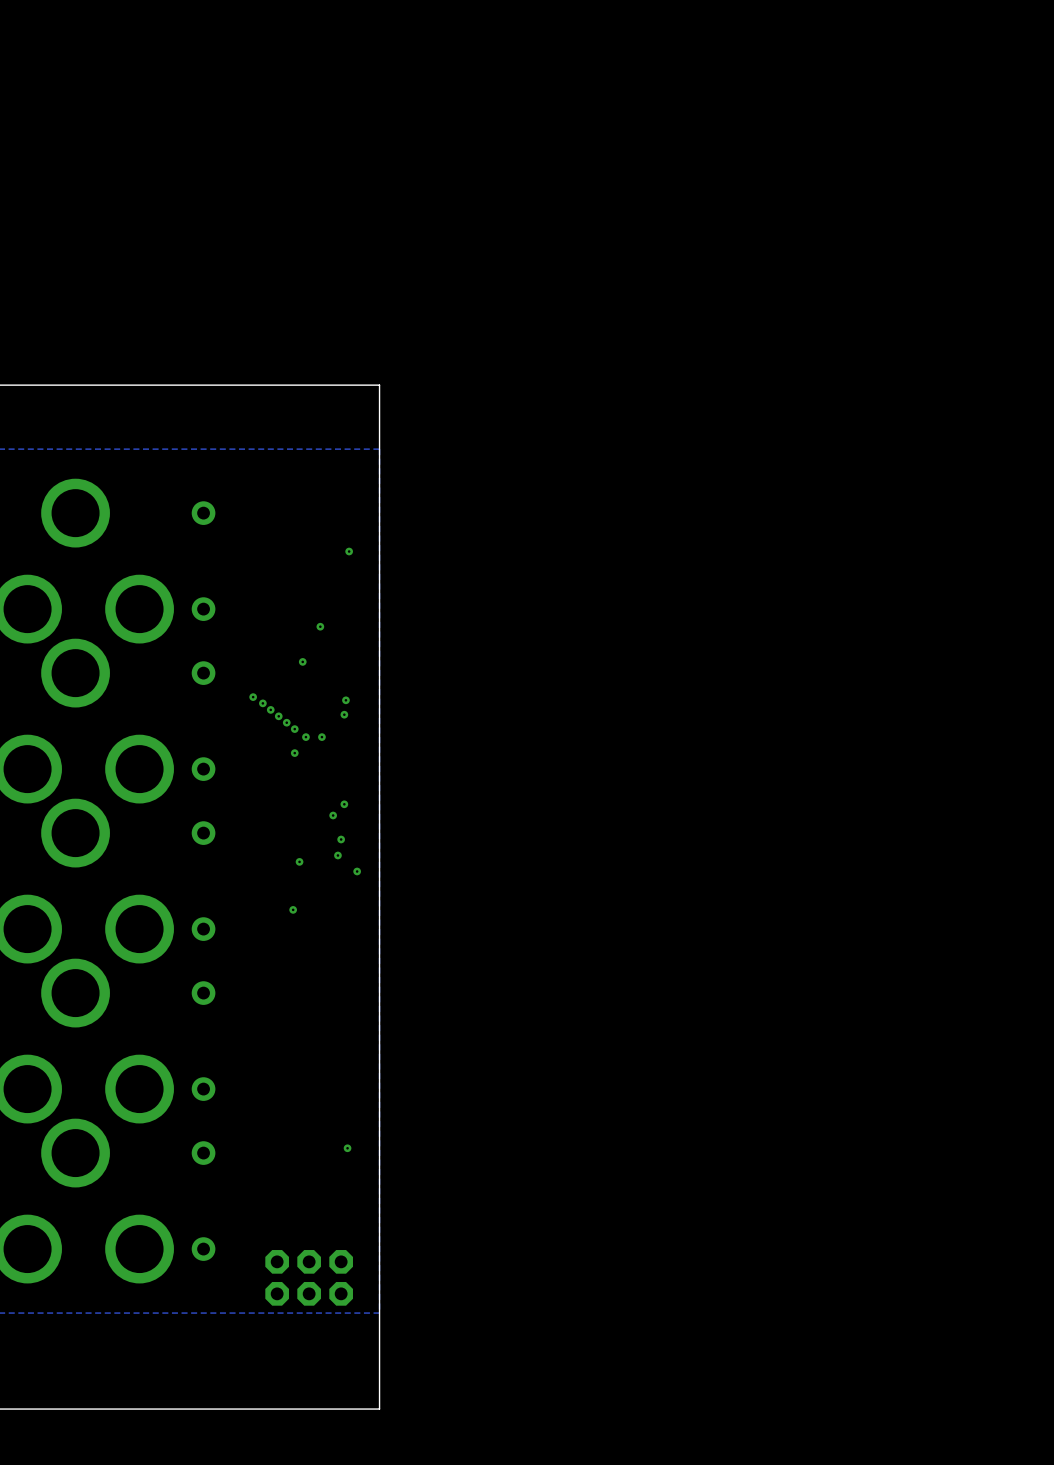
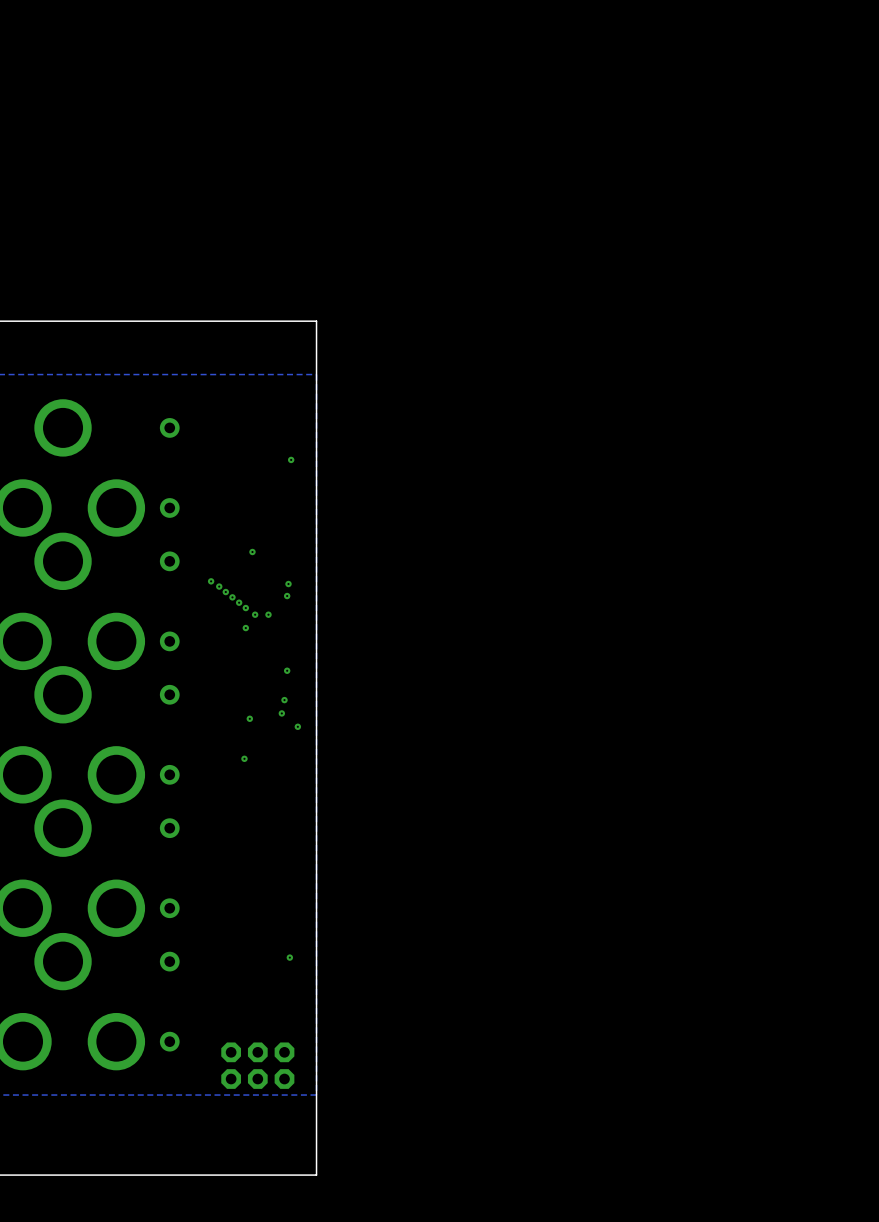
via: (320, 626) -> none
via: (333, 815) -> none

